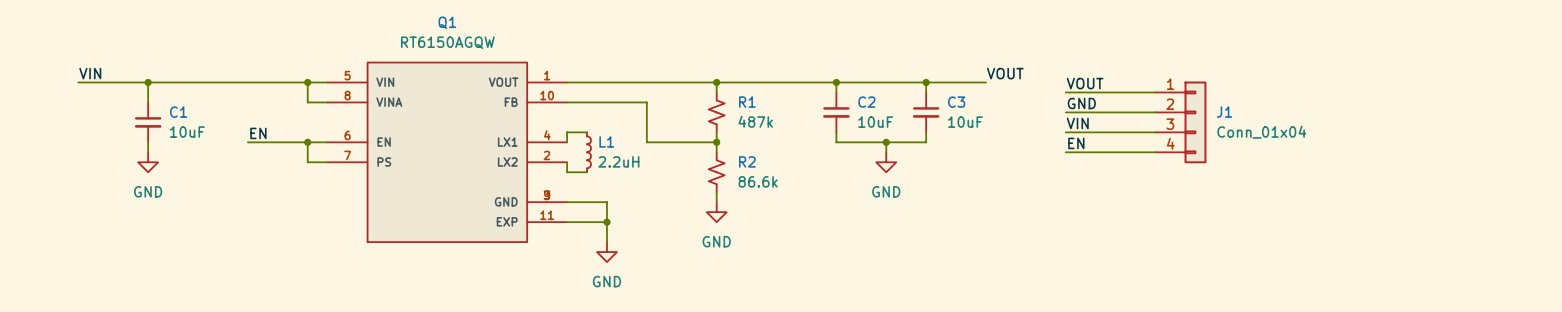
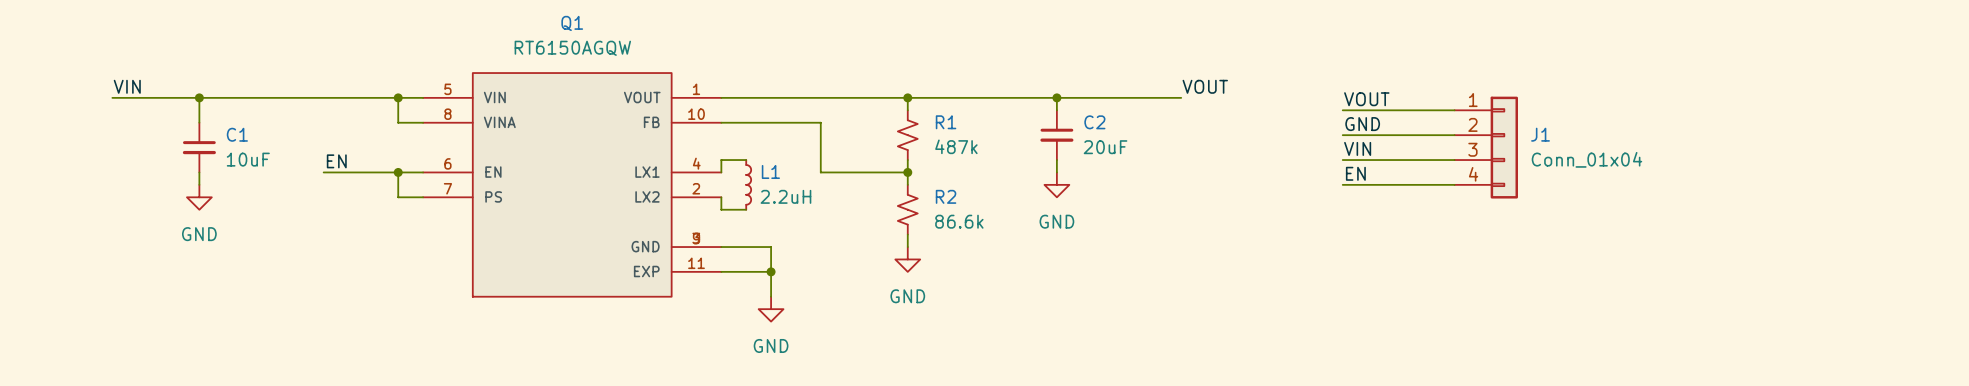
label position: VOUT (1005, 73) -> VOUT (1205, 86)
wire: (926, 82) (926, 92) -> none
junction: (926, 82) -> none
wire: (936, 82) (986, 82) -> none
C3: 10uF (926, 112) -> none
C2 value: 10uF (875, 122) -> 20uF (1105, 147)
wire: (926, 132) (926, 142) (836, 142) -> none
wire: (886, 142) (886, 152) -> none
junction: (886, 142) -> none
power symbol position: GND (886, 162) -> GND (1056, 184)

